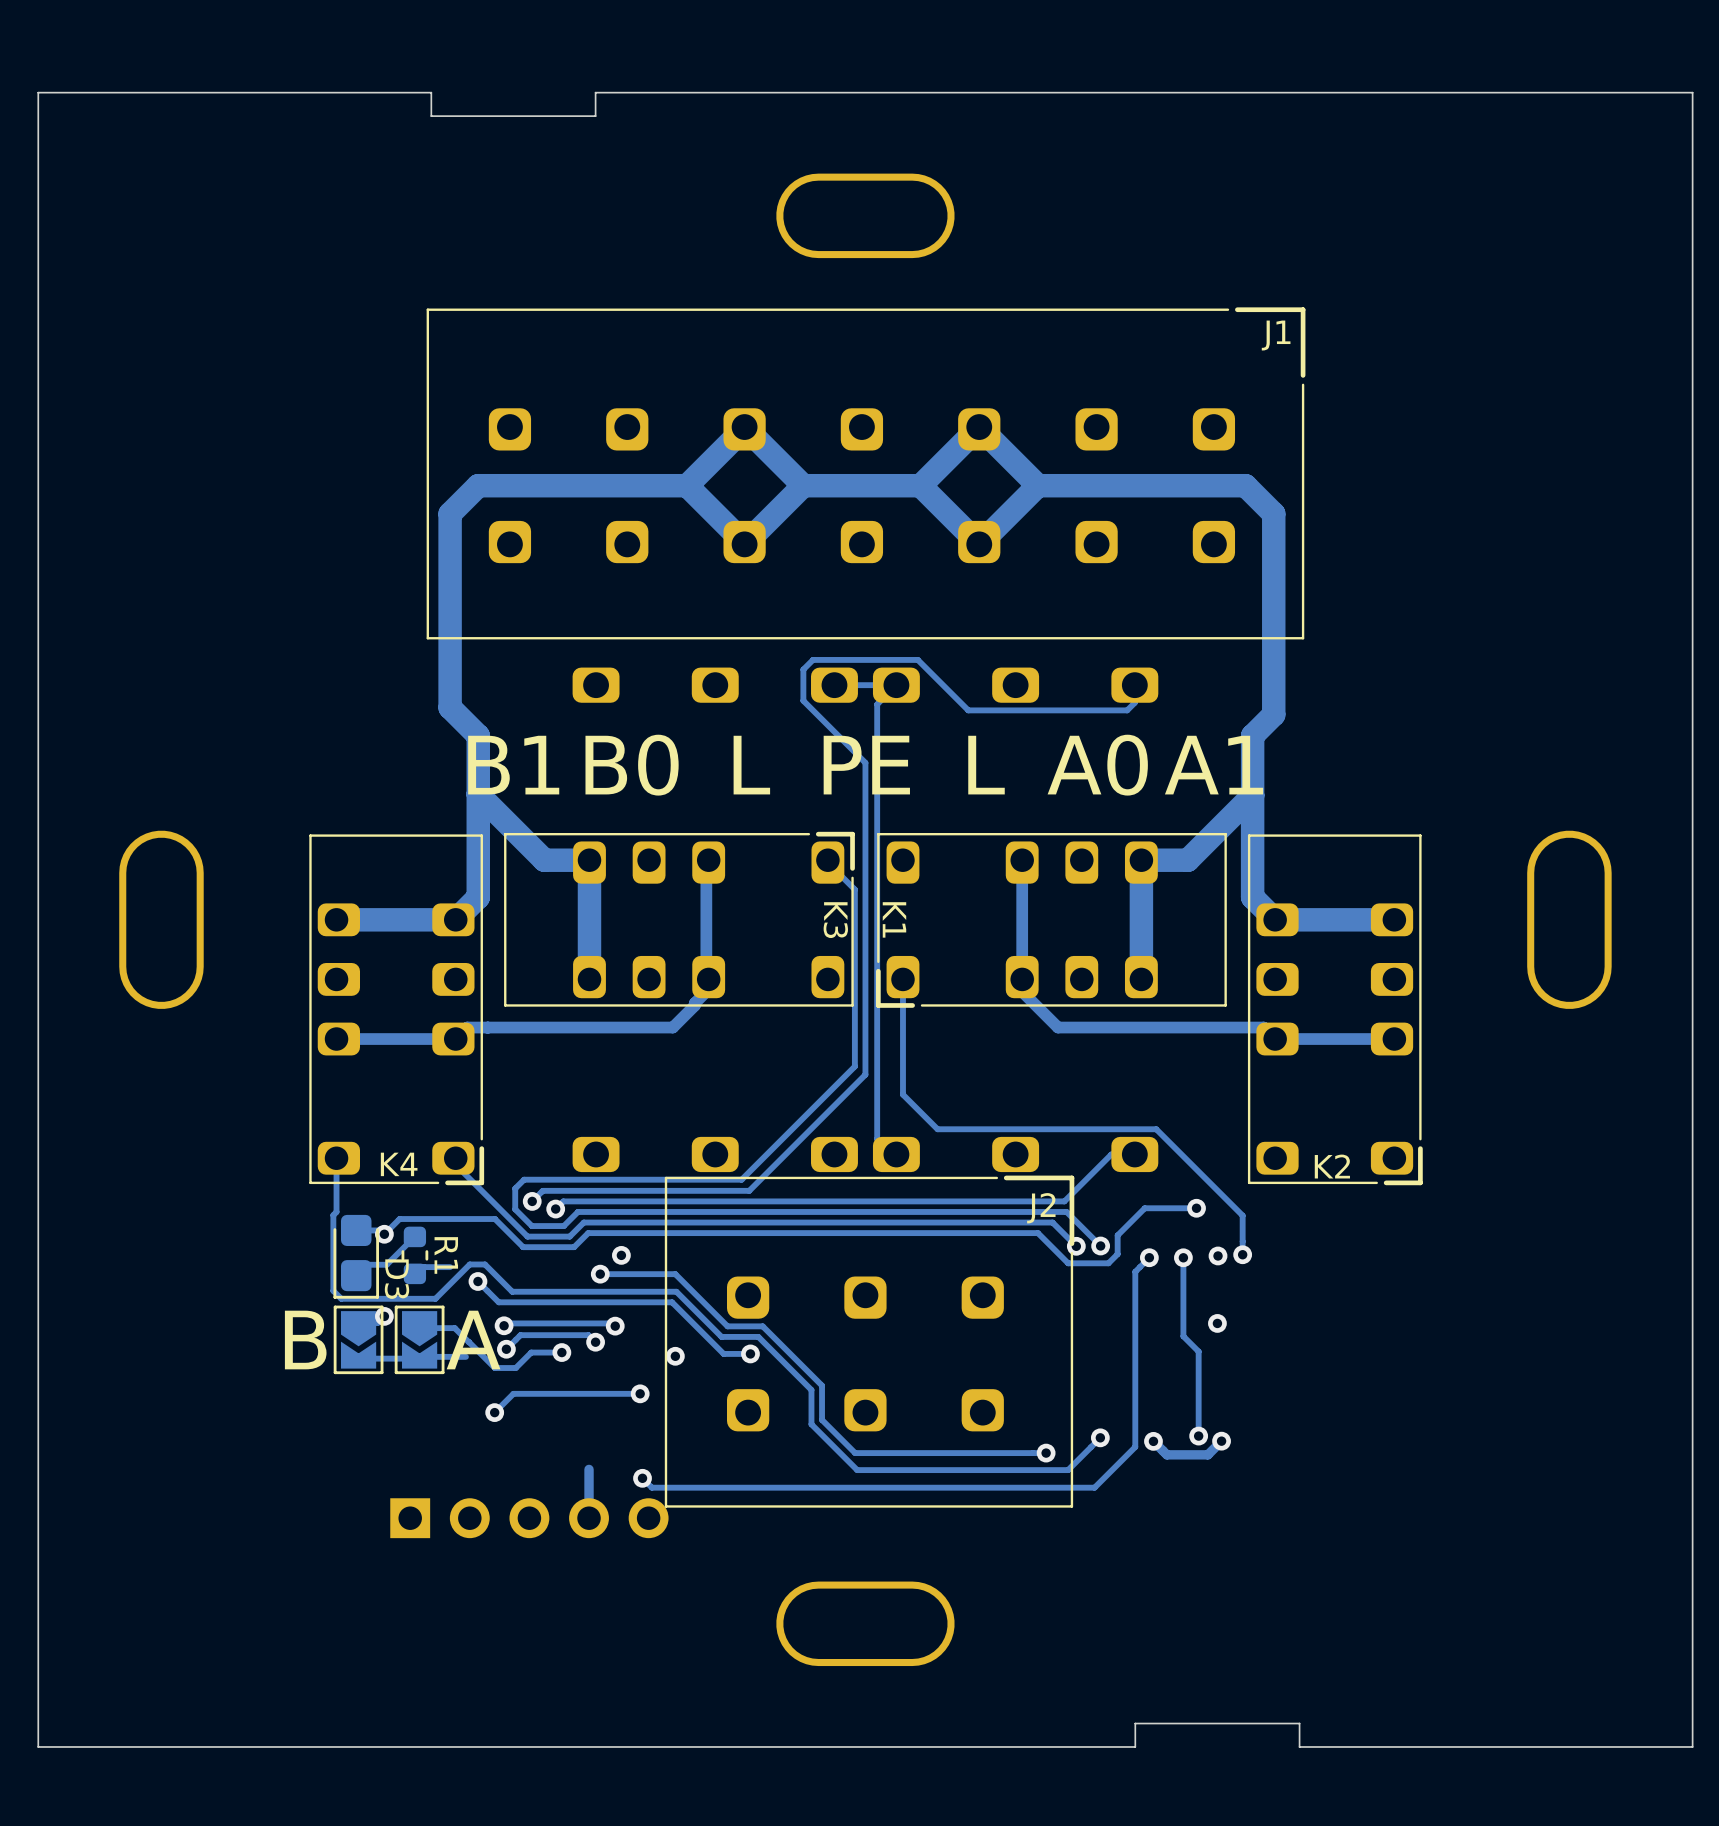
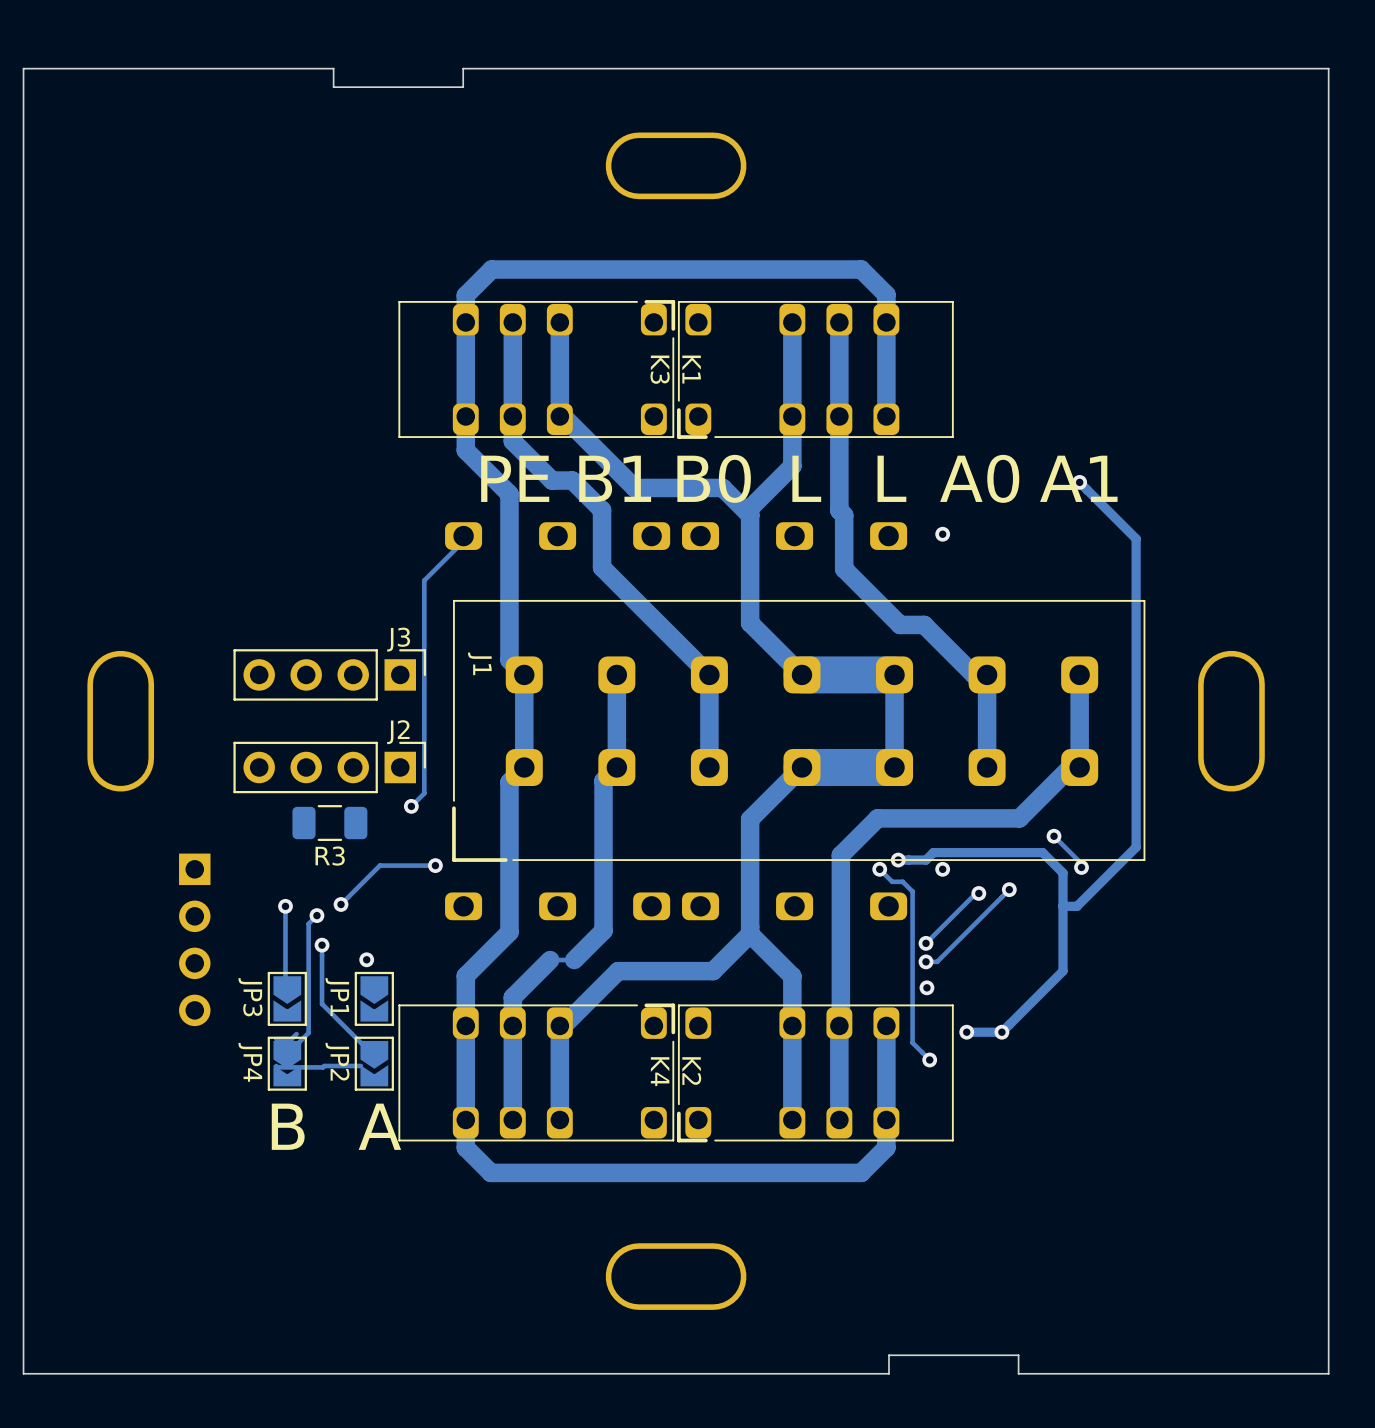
J1 footprint: [426, 307, 1306, 640] -> [452, 599, 1146, 862]
J1 name position: J1 (1276, 335) -> J1 (479, 663)
track: none -> (512, 322) (512, 441) (552, 480) (572, 480) (602, 510) (602, 567) (709, 674) (709, 767)
track: none -> (559, 322) (559, 416) (563, 416) (634, 487) (722, 487) (750, 515)
track: none -> (792, 322) (792, 466) (750, 508) (750, 623) (801, 674) (894, 674) (894, 767) (801, 767) (750, 819) (750, 934)
track: none -> (839, 322) (839, 510) (844, 515) (844, 569) (900, 624) (924, 624) (974, 674) (987, 674) (987, 767)
track: (980, 424) (980, 428) (1037, 485) -> none
track: (979, 427) (920, 485) -> none
track: (687, 485) (478, 485) (450, 513) (450, 707) (478, 735) (478, 897) (455, 919) (336, 919) -> none
track: (803, 485) (744, 544) (687, 485) -> none
track: (803, 485) (744, 427) (687, 485) -> none
track: (920, 485) (803, 485) -> none
track: (1037, 485) (979, 544) (920, 485) -> none
track: (1037, 485) (1245, 485) (1273, 513) (1273, 714) (1252, 735) (1252, 897) (1275, 919) (1394, 919) -> none
track: none -> (886, 416) (886, 294) (861, 269) (491, 269) (465, 295) (465, 450) (509, 494) (509, 660) (524, 674) (524, 767) (509, 782) (509, 932) (465, 975) (465, 1147) (490, 1172) (861, 1172) (886, 1147) (886, 1025)
text: none -> L (806, 478)
text: none -> L (891, 478)
track: none -> (1079, 482) (1136, 538) (1136, 847) (1077, 906) (1063, 906)
via: none -> (1079, 482)
via: none -> (942, 534)
track: none -> (463, 536) (463, 541) (424, 580) (424, 793) (411, 806)
track: (834, 685) (896, 685) (877, 704) (877, 1138) (892, 1154) (896, 1154) -> none
track: (1134, 685) (1134, 702) (1127, 710) (968, 710) (917, 659) (813, 659) (803, 669) (803, 700) (865, 762) (865, 1074) (749, 1190) (542, 1190) (532, 1201) -> none
text position: B1 (513, 765) -> B1 (615, 478)
text position: B0 (632, 765) -> B0 (714, 478)
text: L (751, 765) -> none
text position: PE (866, 765) -> PE (515, 478)
text: L (986, 765) -> none
text position: A0 (1097, 765) -> A0 (979, 478)
text position: A1 (1214, 765) -> A1 (1078, 478)
track: (478, 794) (544, 860) (589, 860) (589, 979) -> none
track: (1252, 795) (1187, 860) (1141, 860) (1141, 979) -> none
K3 footprint: [504, 831, 855, 1007] -> [398, 300, 676, 438]
K1 footprint: [876, 833, 1227, 1008] -> [677, 300, 954, 439]
K4 footprint: [309, 834, 485, 1186] -> [398, 1003, 676, 1142]
K2 footprint: [1247, 834, 1423, 1186] -> [677, 1004, 954, 1143]
track: (706, 860) (706, 991) (672, 1027) (467, 1027) (455, 1039) (336, 1039) -> none
track: (825, 860) (854, 889) (854, 1066) (741, 1179) (524, 1179) (515, 1188) (515, 1209) (531, 1226) (563, 1226) (577, 1211) (1066, 1211) (1100, 1246) -> none
track: (1022, 860) (1022, 991) (1058, 1027) (1263, 1027) (1275, 1039) (1394, 1039) -> none
J3: none -> (329, 674)
track: none -> (1079, 674) (1079, 767) (1070, 767) (1019, 818) (877, 818) (840, 855) (839, 1119)
track: (902, 979) (902, 1094) (937, 1129) (1156, 1129) (1242, 1215) (1242, 1254) -> none
via: none -> (411, 806)
R3: none -> (329, 823)
track: none -> (1054, 836) (1081, 863) (1081, 867)
via: none -> (1054, 836)
track: none -> (898, 860) (926, 860) (933, 852) (1042, 852) (1063, 873) (1063, 971) (1001, 1032) (966, 1032)
via: none -> (898, 860)
track: none -> (435, 865) (379, 865) (341, 904)
via: none -> (435, 865)
via: none -> (1081, 867)
track: none -> (879, 869) (892, 881) (902, 881) (912, 891) (912, 1042) (929, 1059)
via: none -> (879, 869)
via: none -> (942, 869)
track: none -> (1009, 889) (937, 961) (926, 961)
via: none -> (1009, 889)
track: none -> (978, 893) (975, 893) (926, 943)
via: none -> (978, 893)
via: none -> (341, 904)
track: none -> (285, 906) (285, 983) (287, 985)
via: none -> (285, 906)
track: (1134, 1154) (1111, 1154) (1064, 1201) (563, 1201) (555, 1209) -> none
track: (336, 1158) (336, 1212) (333, 1215) (333, 1290) (341, 1298) (435, 1298) (469, 1264) (485, 1264) (512, 1291) (676, 1291) (721, 1336) (758, 1336) (811, 1389) (811, 1424) (857, 1470) (1068, 1470) (1100, 1437) -> none
track: (455, 1158) (455, 1164) (527, 1236) (569, 1236) (583, 1222) (705, 1222) -> (512, 1119) (512, 997) (550, 960)
K4 name position: K4 (399, 1164) -> K4 (660, 1071)
track: none -> (316, 915) (308, 923) (308, 1032) (298, 1043)
via: none -> (316, 915)
K2 name position: K2 (1332, 1166) -> K2 (691, 1071)
J2 footprint: [664, 1175, 1075, 1508] -> [233, 741, 426, 794]
track: none -> (750, 934) (792, 976) (792, 1119)
track: none -> (750, 934) (713, 971) (618, 971) (563, 1025) (559, 1025) (559, 1119)
part: none -> (194, 939)
via: (532, 1201) -> none
via: none -> (926, 943)
track: none -> (322, 945) (322, 1003) (368, 1050) (379, 1050)
via: none -> (322, 945)
J2 name position: J2 (1041, 1208) -> J2 (398, 732)
track: (1196, 1208) (1144, 1208) (1117, 1235) (1117, 1254) (1108, 1263) (1068, 1263) (1037, 1233) (588, 1233) (574, 1247) (523, 1247) (495, 1219) (399, 1219) (384, 1234) (380, 1230) (356, 1230) -> none
via: (1196, 1208) -> none
via: (555, 1209) -> none
via: none -> (366, 959)
track: (736, 1222) (1052, 1222) (1076, 1246) -> (574, 960) (603, 930) (603, 780) (616, 767) (616, 674)
via: none -> (926, 961)
via: (384, 1234) -> none
track: (414, 1236) (386, 1264) (367, 1264) (356, 1275) -> none
via: (1076, 1246) -> none
via: (1100, 1246) -> none
via: (1242, 1254) -> none
R1: (414, 1255) -> none
via: (621, 1255) -> none
via: (1218, 1255) -> none
D3: (356, 1256) -> none
track: (1149, 1257) (1135, 1271) (1135, 1447) (1094, 1487) (651, 1487) (642, 1478) -> none
via: (1149, 1257) -> none
track: (1183, 1257) (1183, 1336) (1198, 1351) (1198, 1436) -> none
track: (450, 1267) (424, 1267) (417, 1273) (414, 1273) -> none
JP3: none -> (287, 998)
JP1: none -> (374, 998)
track: (600, 1274) (675, 1274) (727, 1326) (762, 1326) (822, 1385) (822, 1419) (855, 1453) (1046, 1453) -> none
via: (600, 1274) -> none
track: (477, 1281) (498, 1302) (672, 1302) (723, 1353) (750, 1353) -> none
via: (477, 1281) -> none
via: none -> (1001, 1032)
via: (384, 1316) -> none
track: (419, 1323) (424, 1328) (454, 1328) (468, 1342) -> none
via position: (1217, 1323) -> (966, 1032)
track: (504, 1325) (506, 1323) (612, 1323) (615, 1326) -> none
via: (504, 1325) -> none
via: (615, 1326) -> none
JP4 position: (358, 1339) -> (287, 1063)
part: (419, 1339) -> none
text position: B (305, 1340) -> B (288, 1126)
text position: A (473, 1340) -> A (379, 1126)
track: (469, 1342) (494, 1368) (515, 1368) (531, 1352) (561, 1352) -> none
track: (595, 1342) (588, 1335) (520, 1335) (506, 1349) -> none
via: (595, 1342) -> none
via: (506, 1349) -> none
via: none -> (929, 1059)
JP4 name: none -> JP4 (250, 1062)
via: (561, 1352) -> none
JP2: none -> (374, 1063)
via: (750, 1353) -> none
via: (675, 1356) -> none
track: (640, 1393) (513, 1393) (494, 1412) -> none
via: (640, 1393) -> none
via: (494, 1412) -> none
via: (1198, 1436) -> none
via: (1100, 1437) -> none
via: (1153, 1441) -> none
track: (1221, 1441) (1207, 1454) (1166, 1454) (1153, 1441) -> none
via: (1221, 1441) -> none
via: (1046, 1453) -> none
track: (589, 1469) (589, 1518) -> none
via: (642, 1478) -> none
part: (529, 1518) -> none

